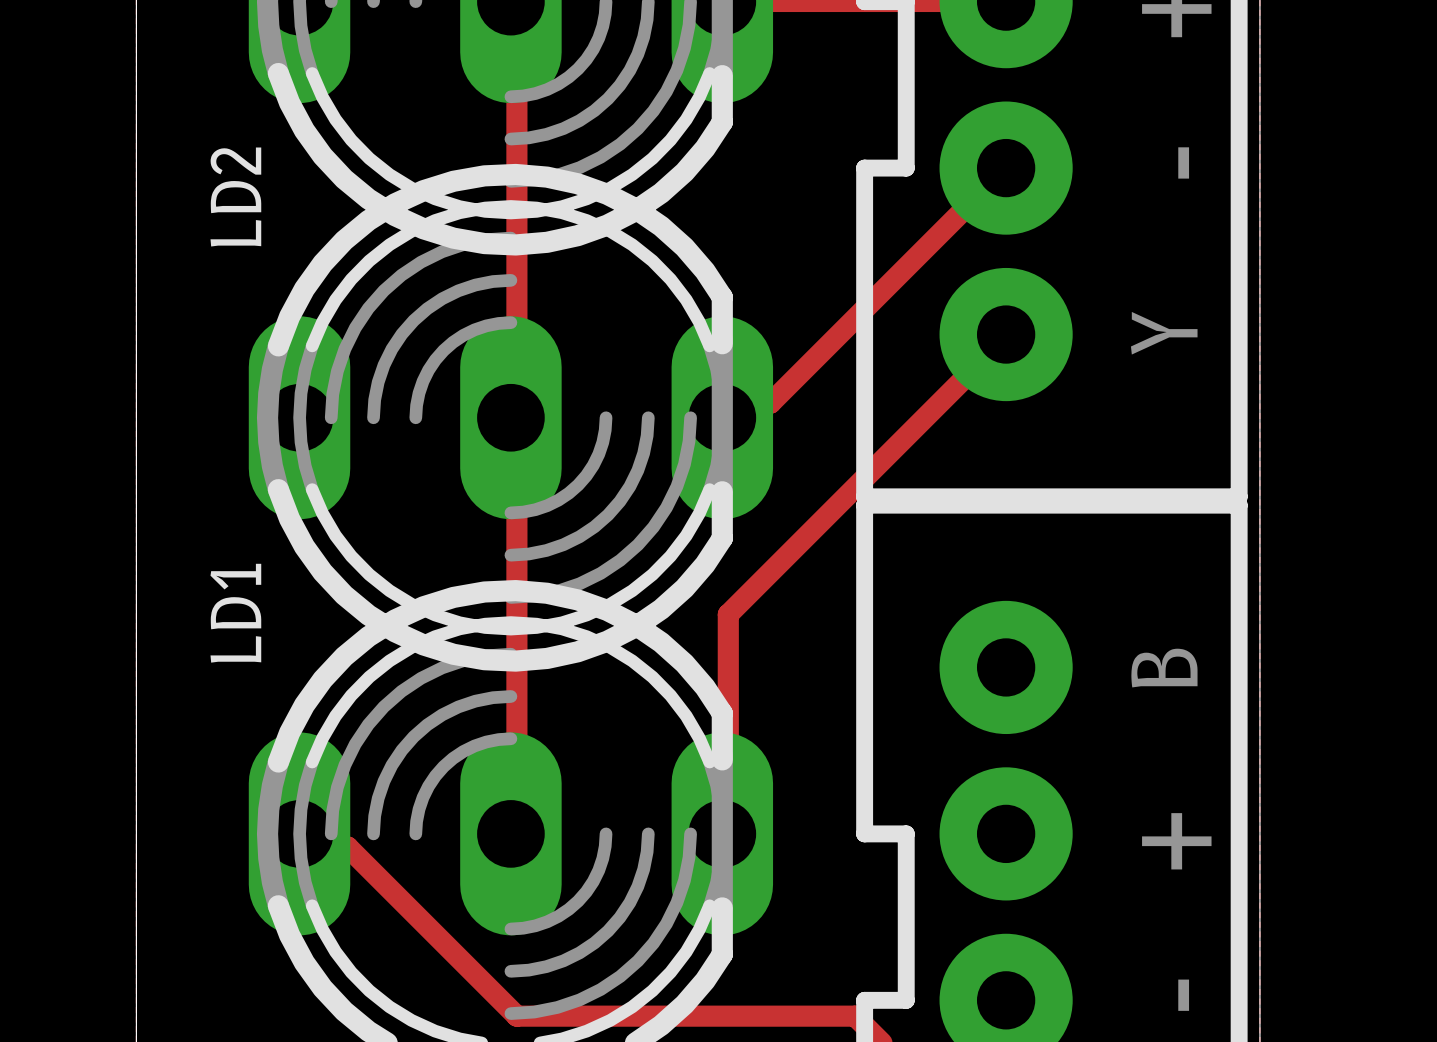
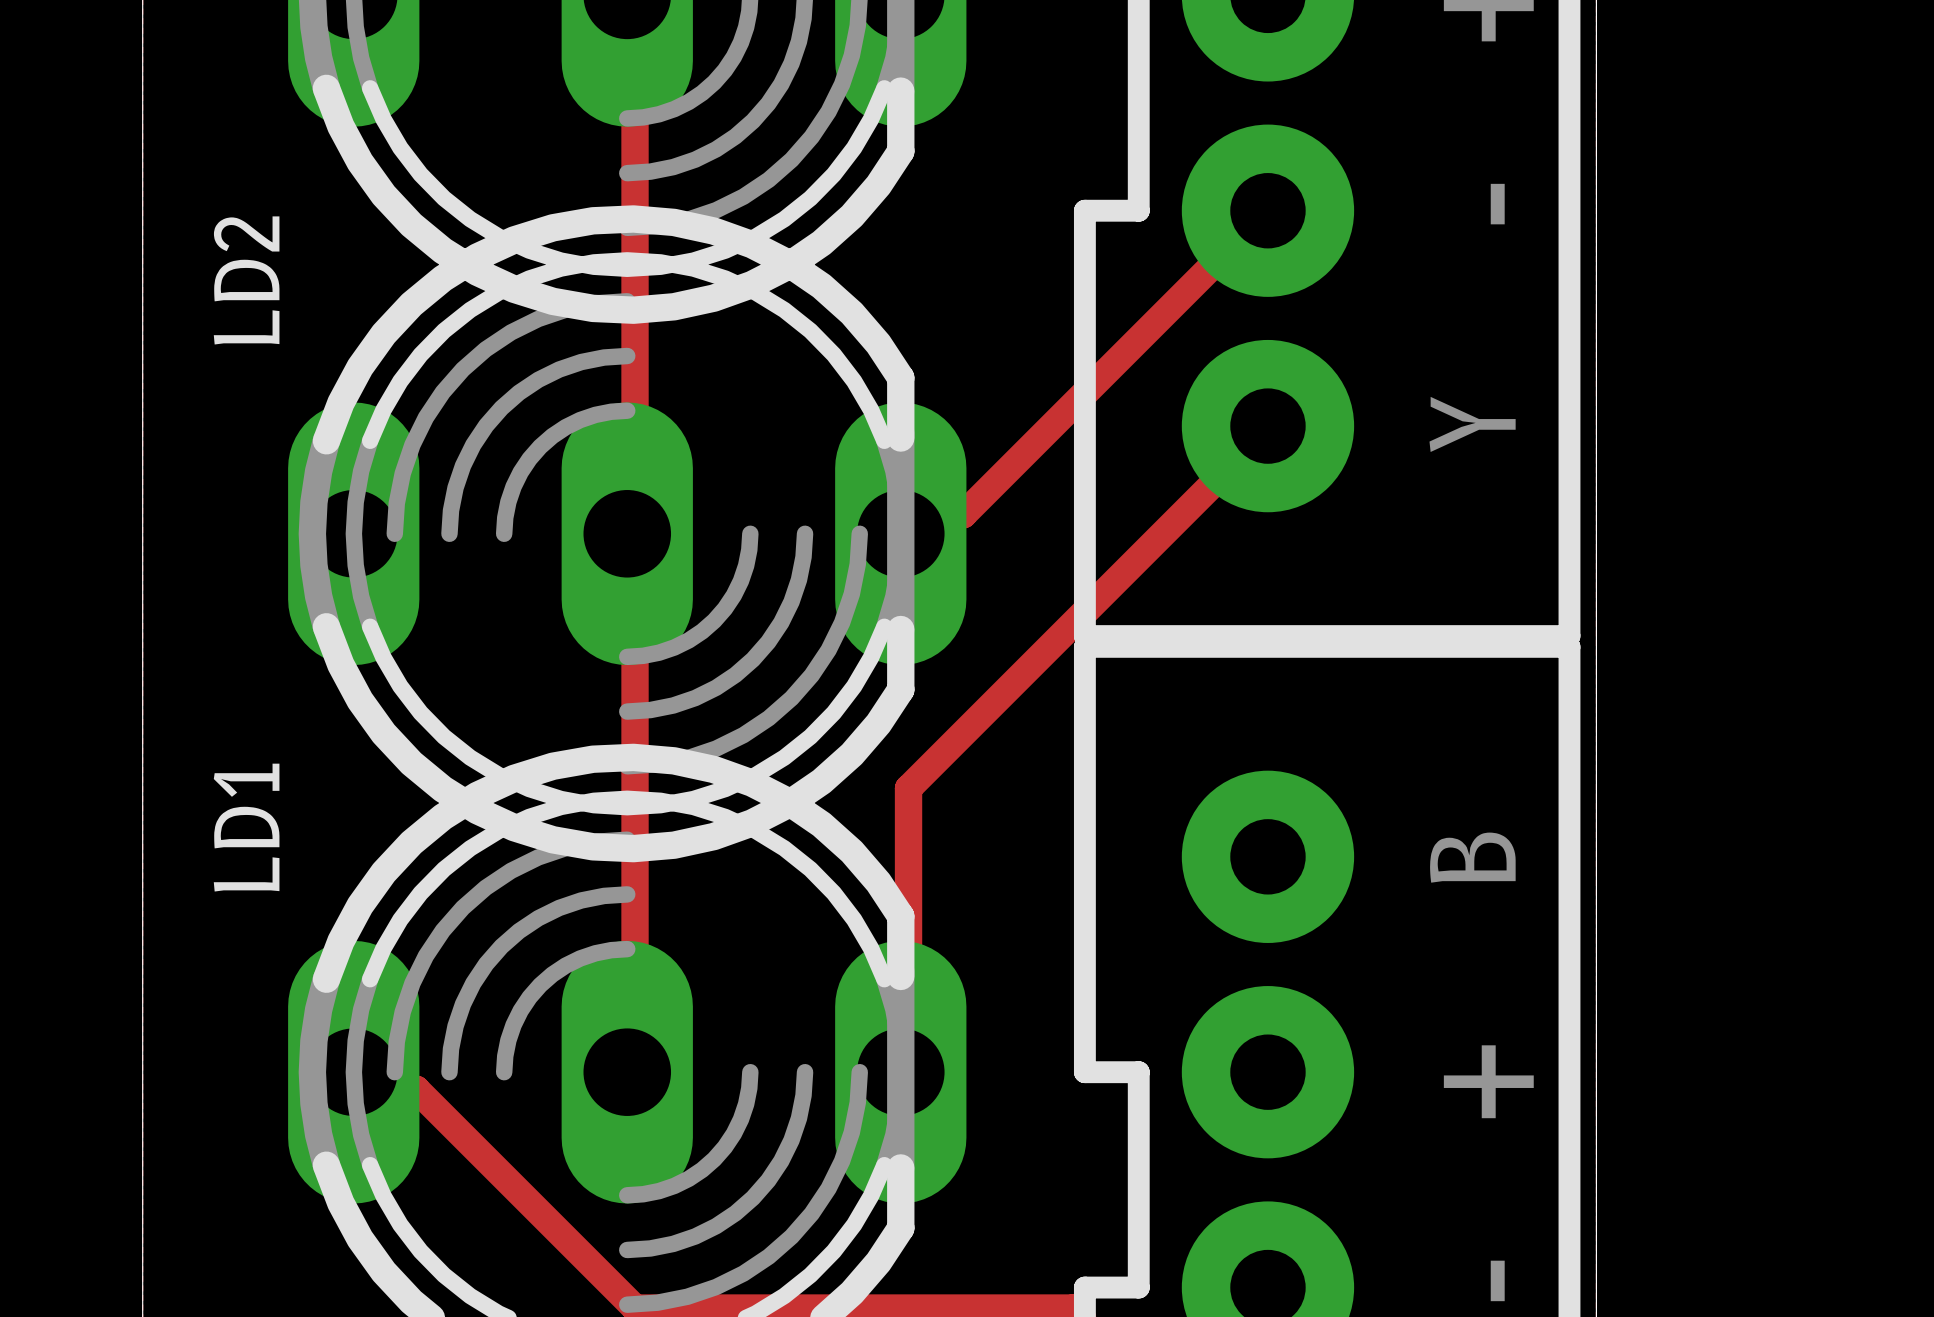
LD2 name position: LD2 (235, 197) -> LD2 (246, 280)
LD1 name position: LD1 (235, 613) -> LD1 (246, 827)

